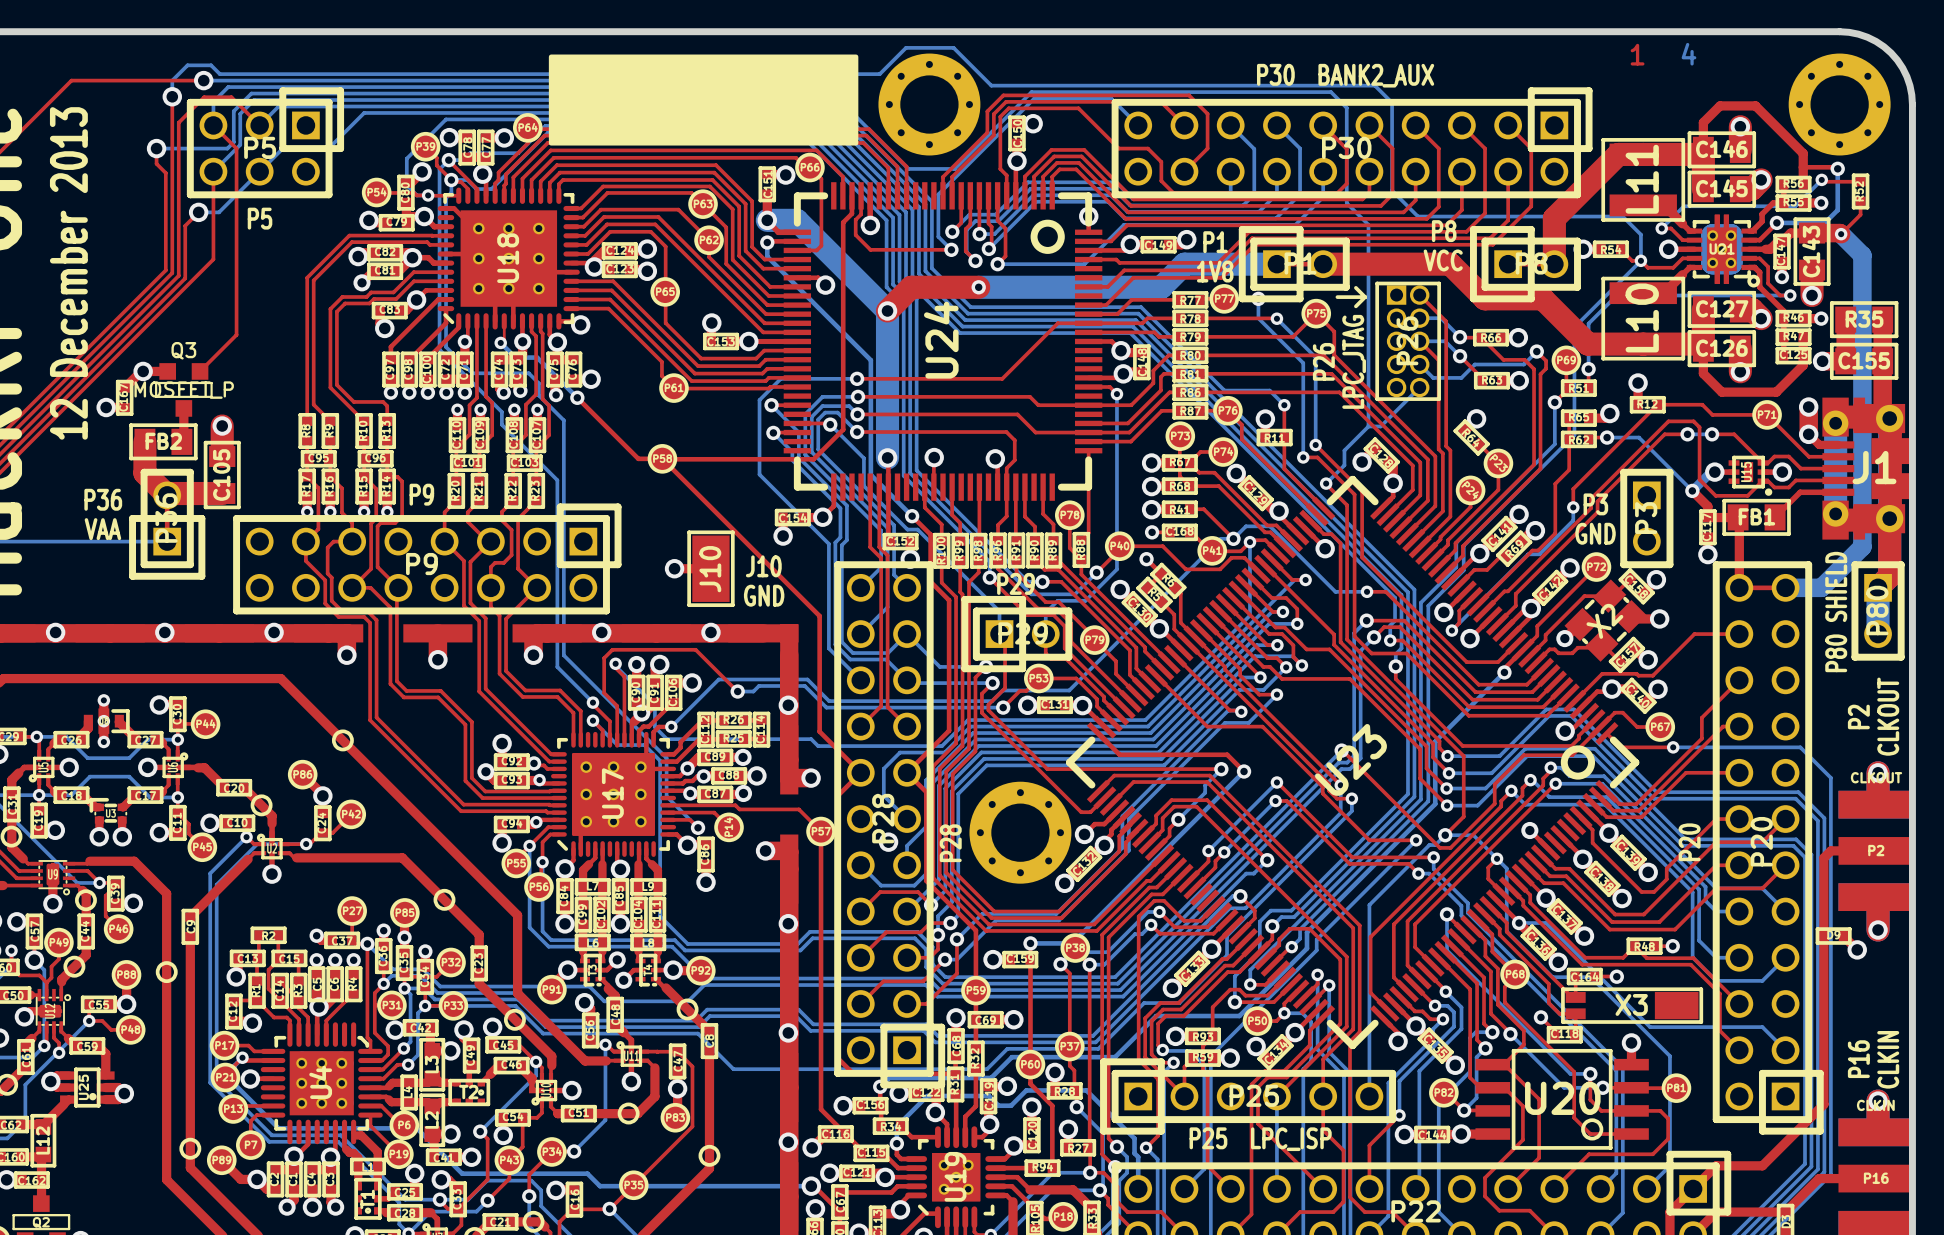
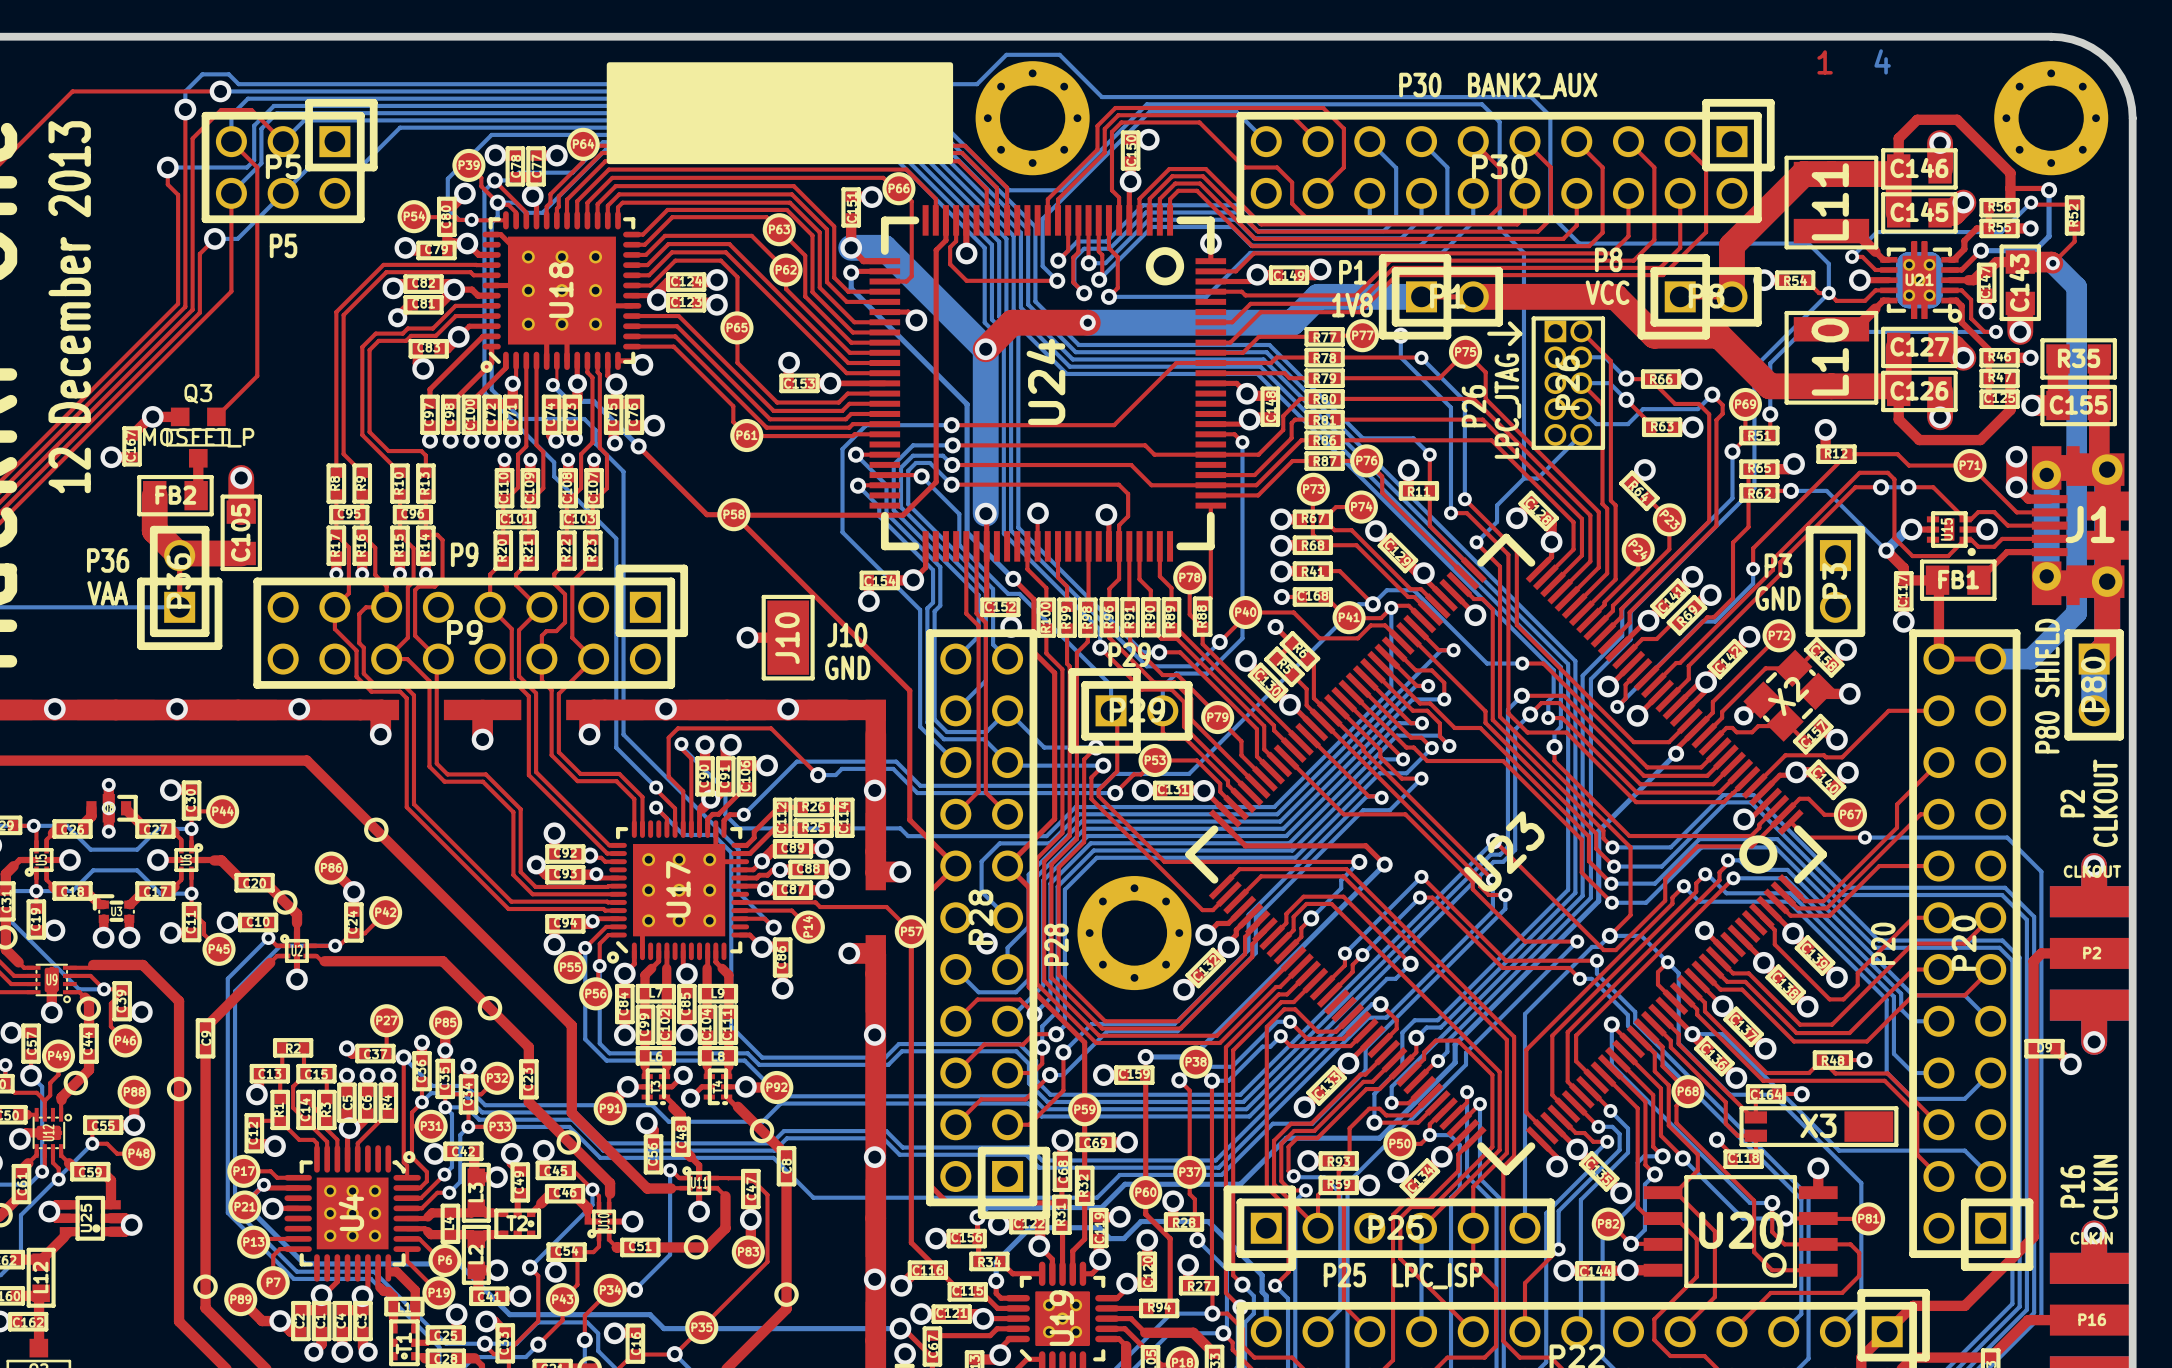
drawing: none -> [480, 360, 493, 373]
drawing: none -> [606, 951, 620, 964]
drawing: none -> [403, 1150, 416, 1164]

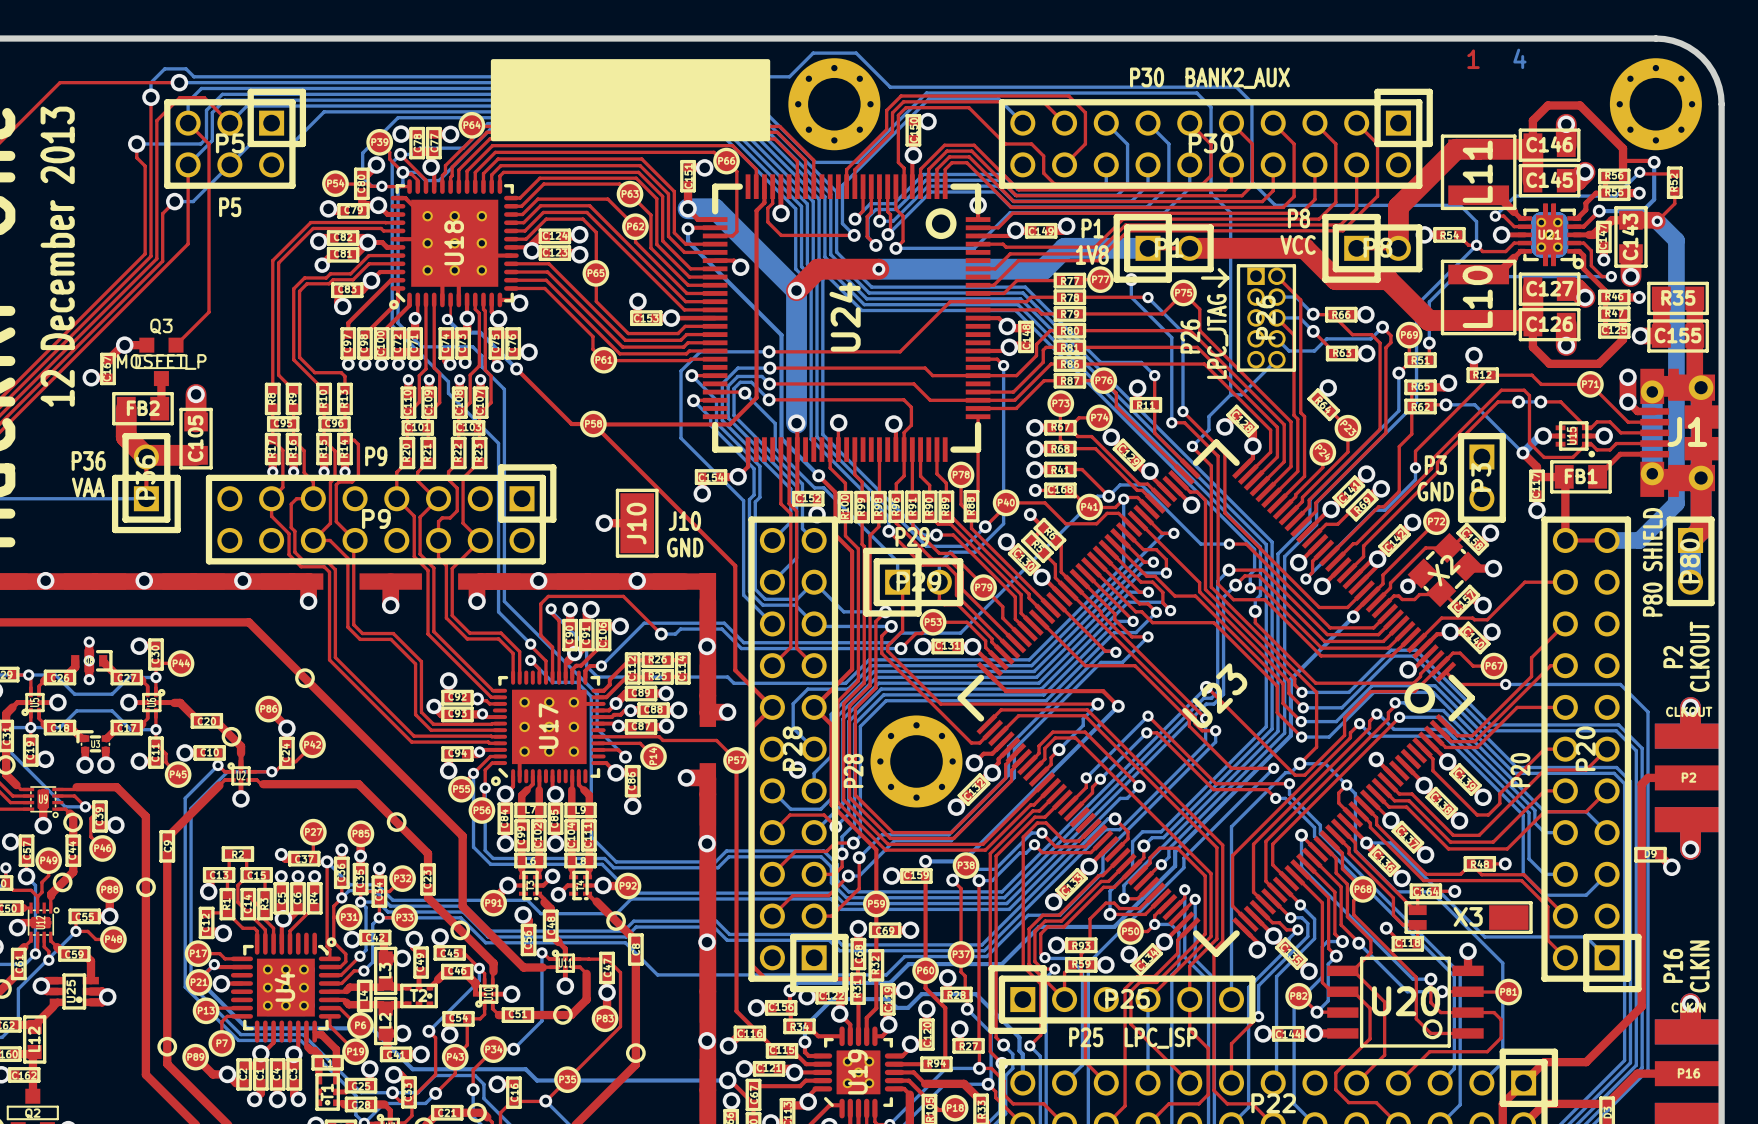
P20 footprint: [1909, 629, 2034, 1271] -> [1541, 516, 1642, 993]

